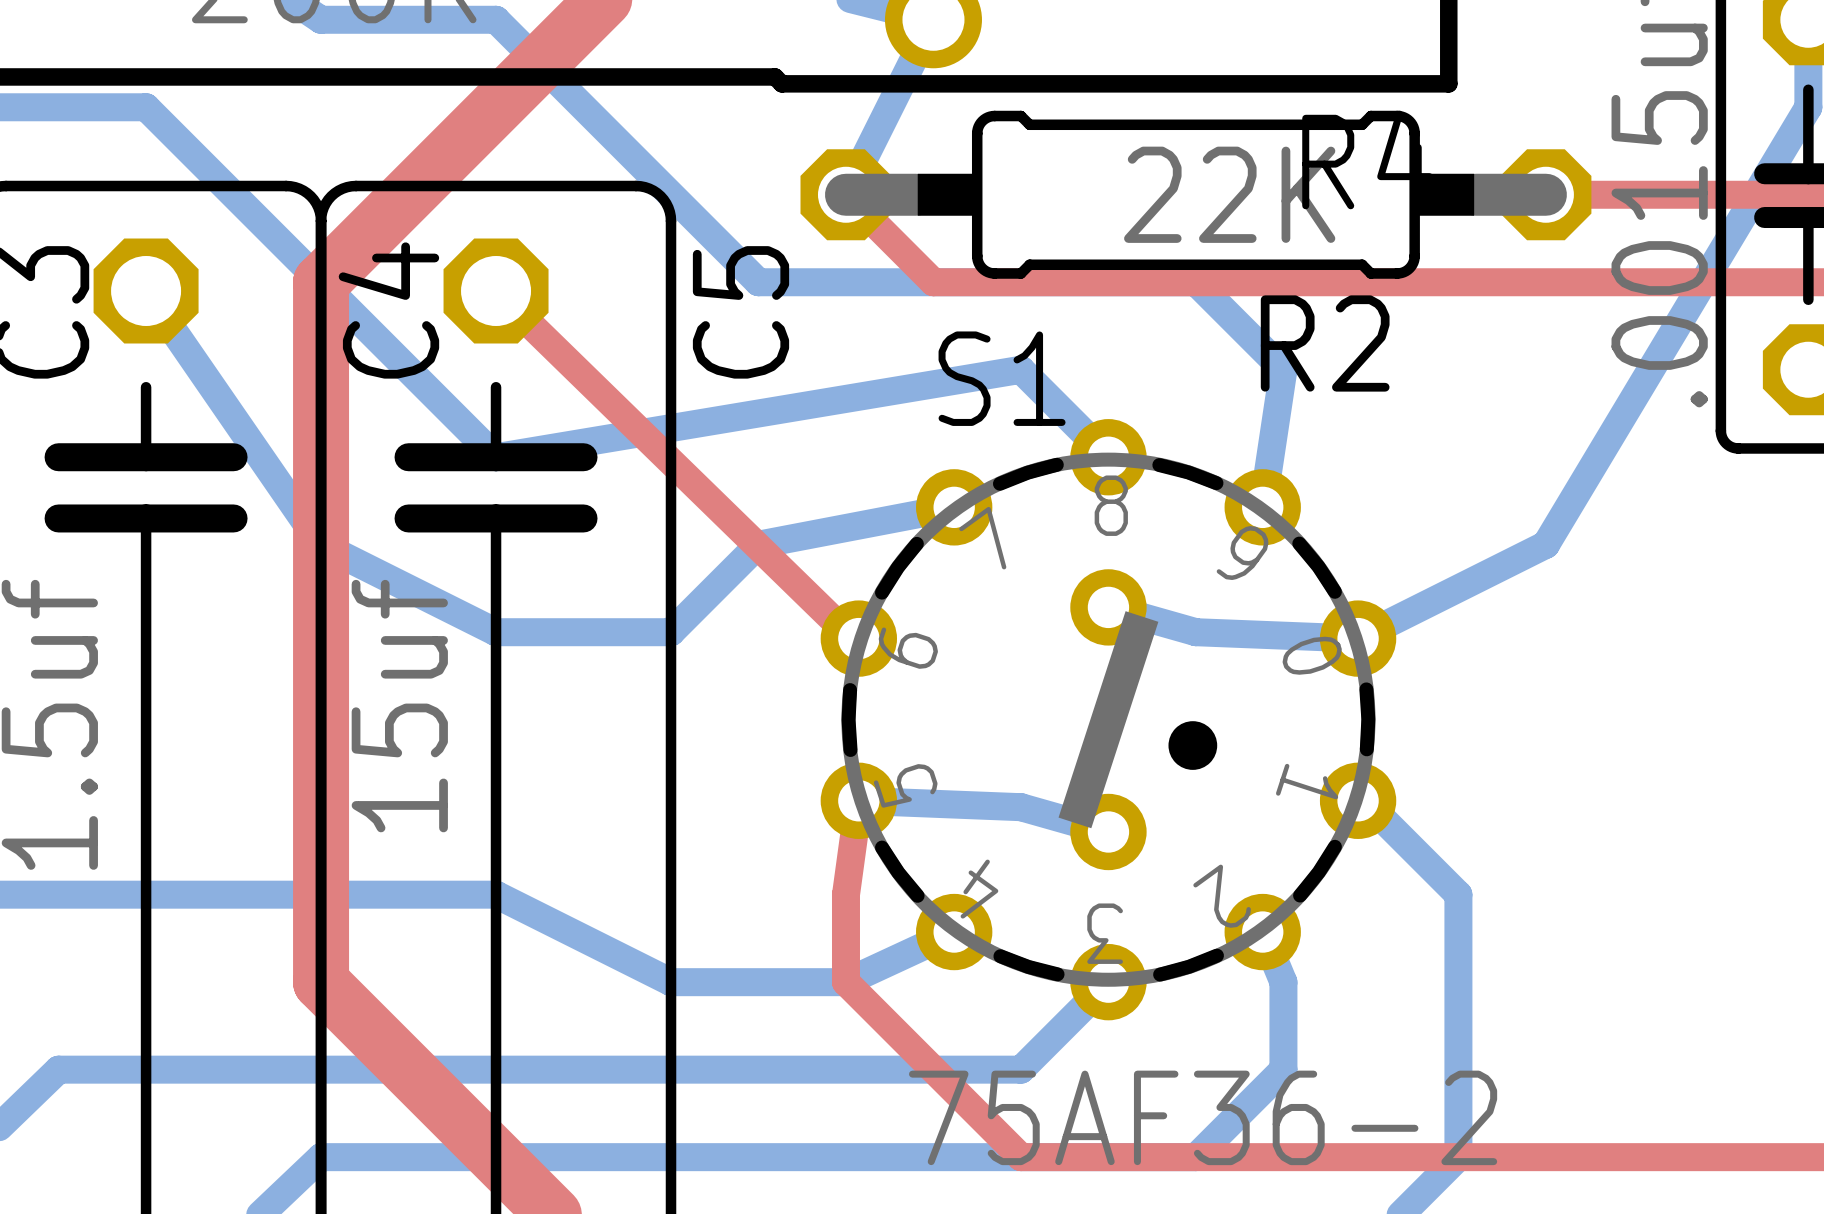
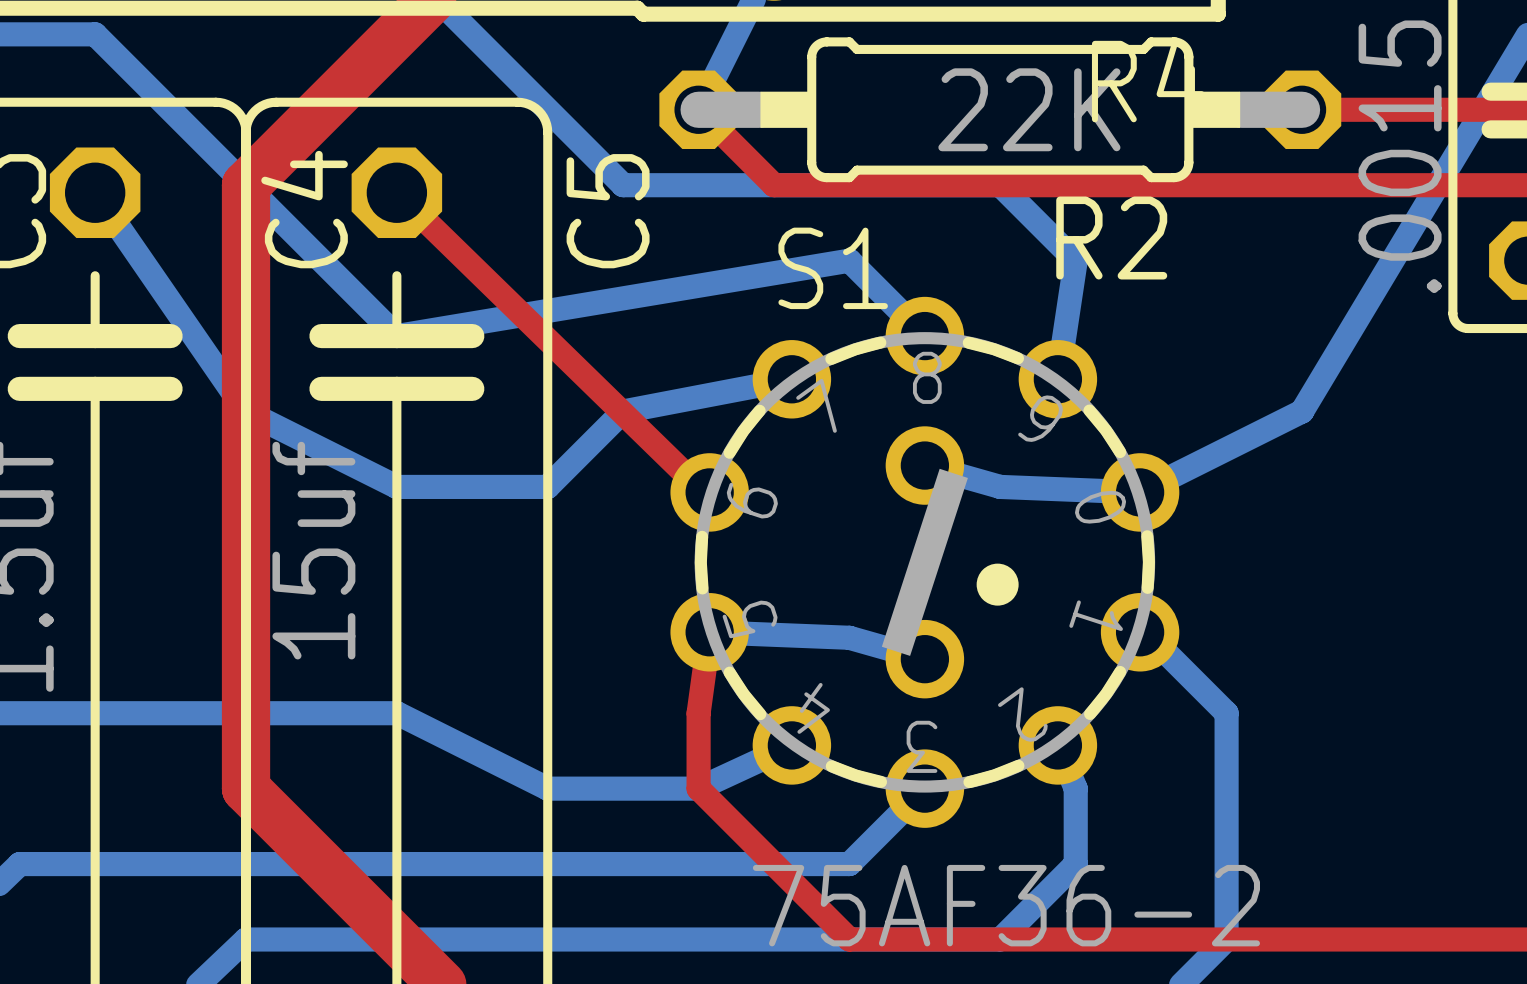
S1 footprint: [820, 419, 1397, 1021] -> [670, 296, 1180, 828]

